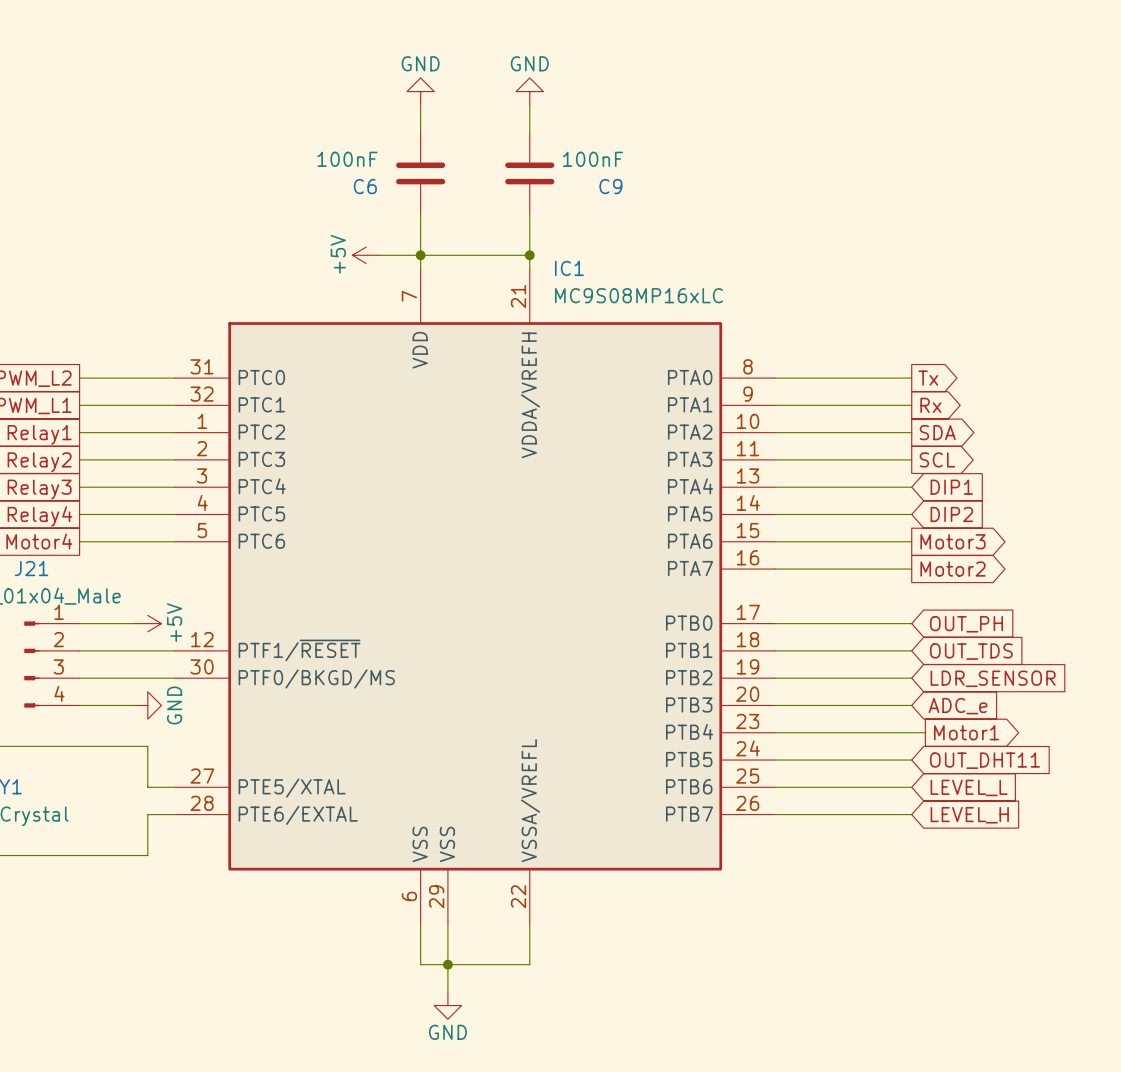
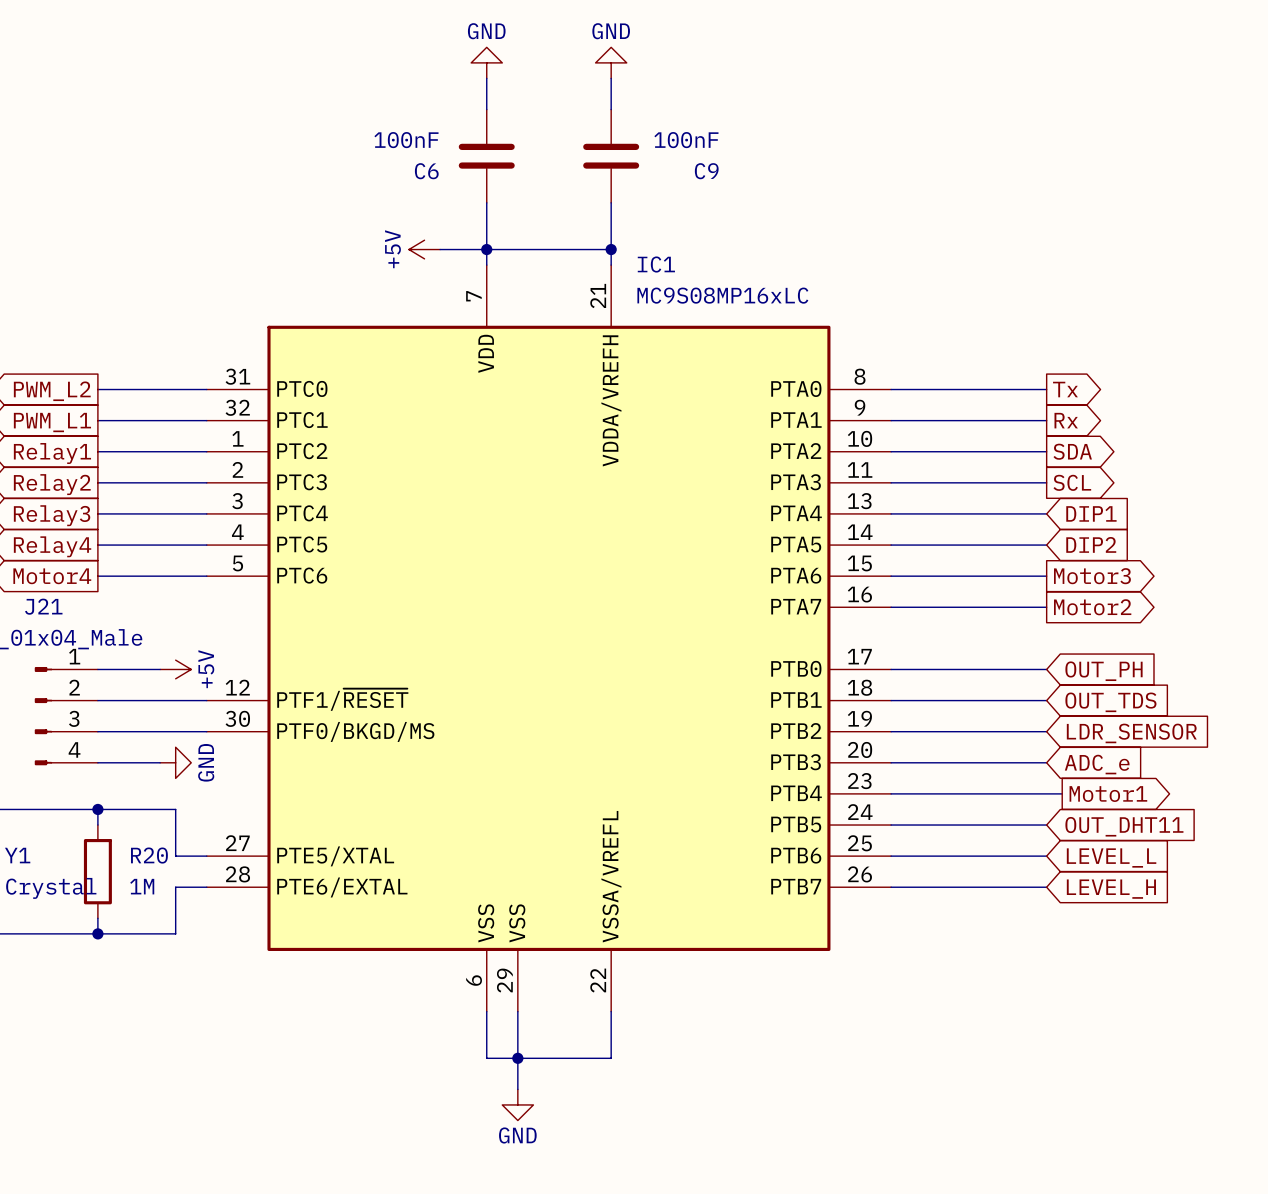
wire: none -> (97, 809) (97, 825)
junction: none -> (97, 809)
R20: none -> 1M (97, 871)
wire: none -> (97, 918) (97, 933)
junction: none -> (97, 933)

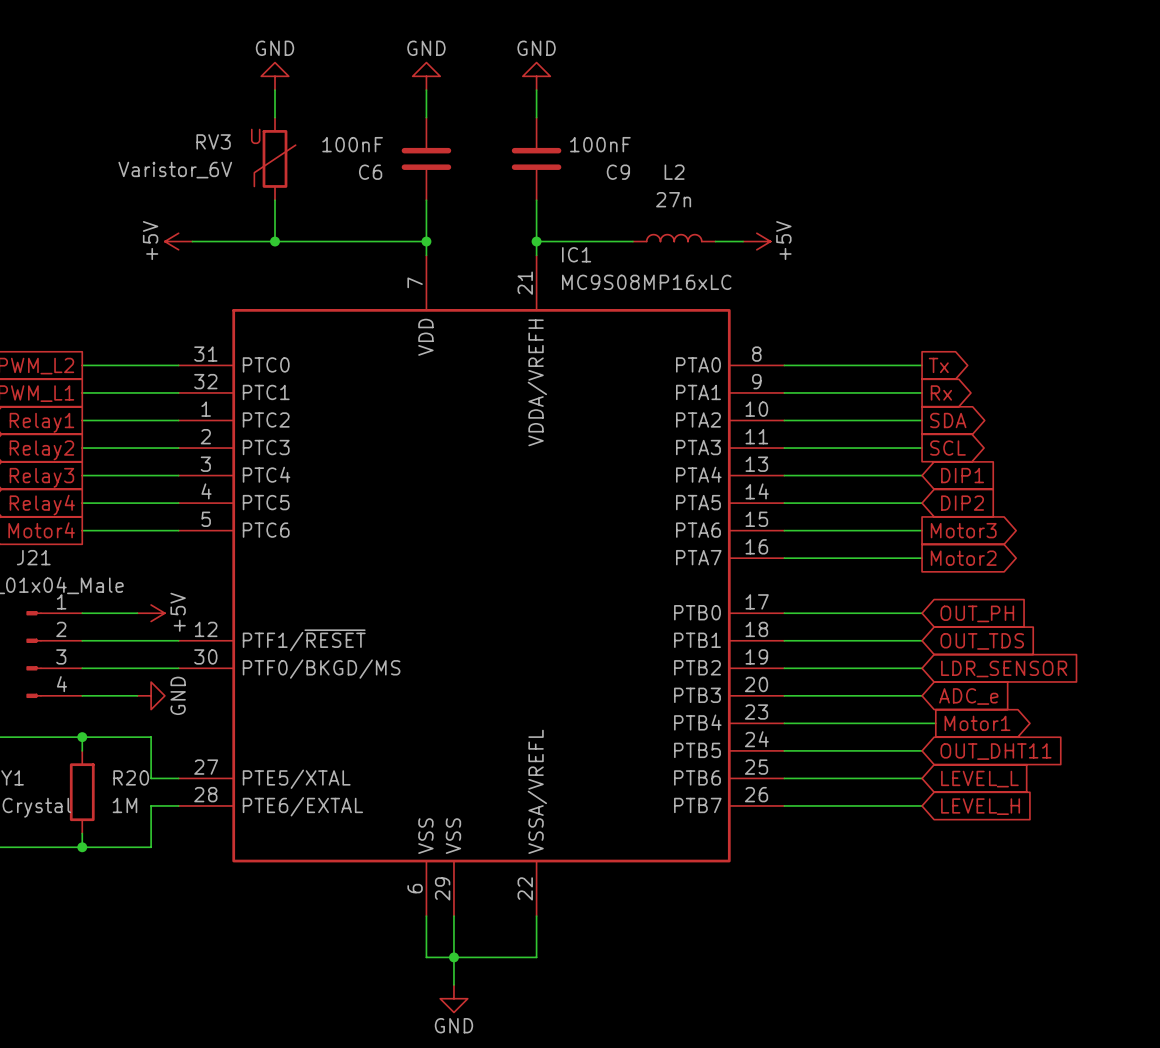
power symbol: none -> GND (275, 76)
wire: none -> (275, 90) (275, 117)
RV3: none -> Varistor_6V (275, 158)
wire: none -> (275, 200) (275, 241)
L2: none -> 27n (674, 238)
power symbol: none -> +5V (178, 241)
wire: none -> (192, 241) (385, 241)
junction: none -> (275, 241)
power symbol: +5V (424, 249) -> none
wire: (486, 249) (611, 249) -> (632, 241) (536, 241)
wire: none -> (715, 241) (743, 241)
power symbol: none -> +5V (756, 241)

